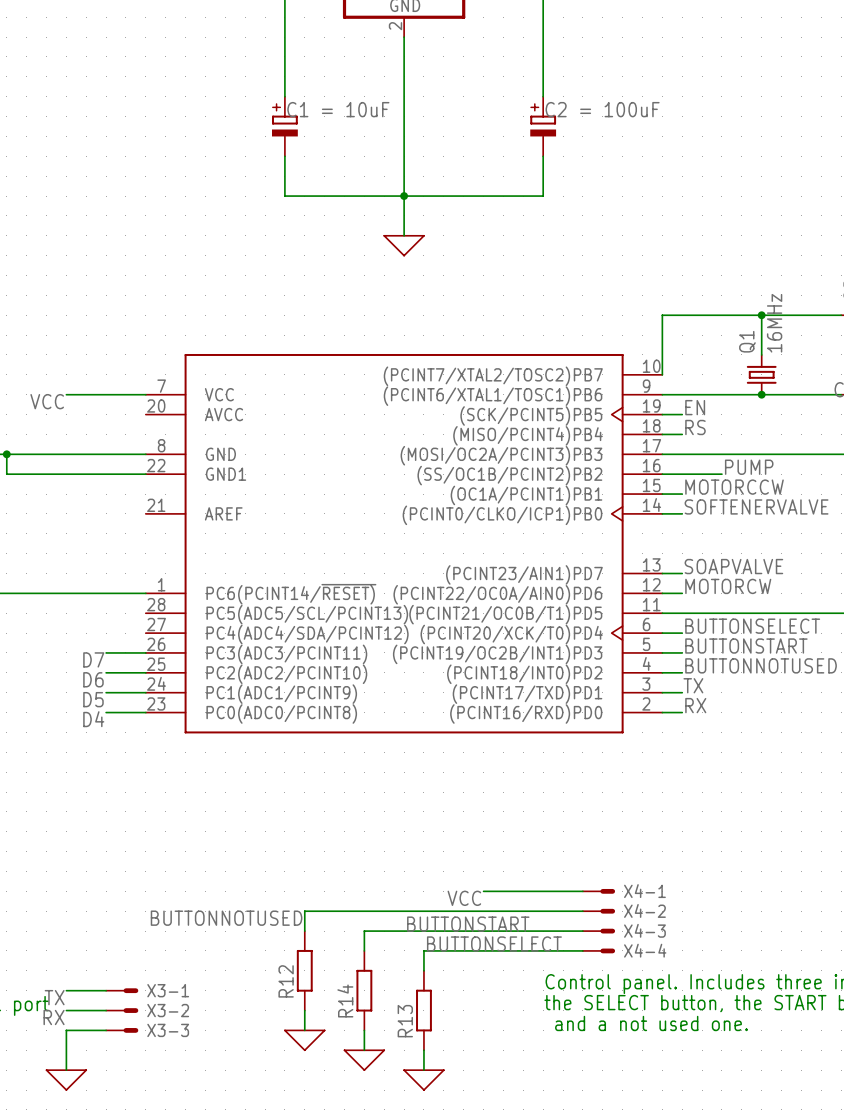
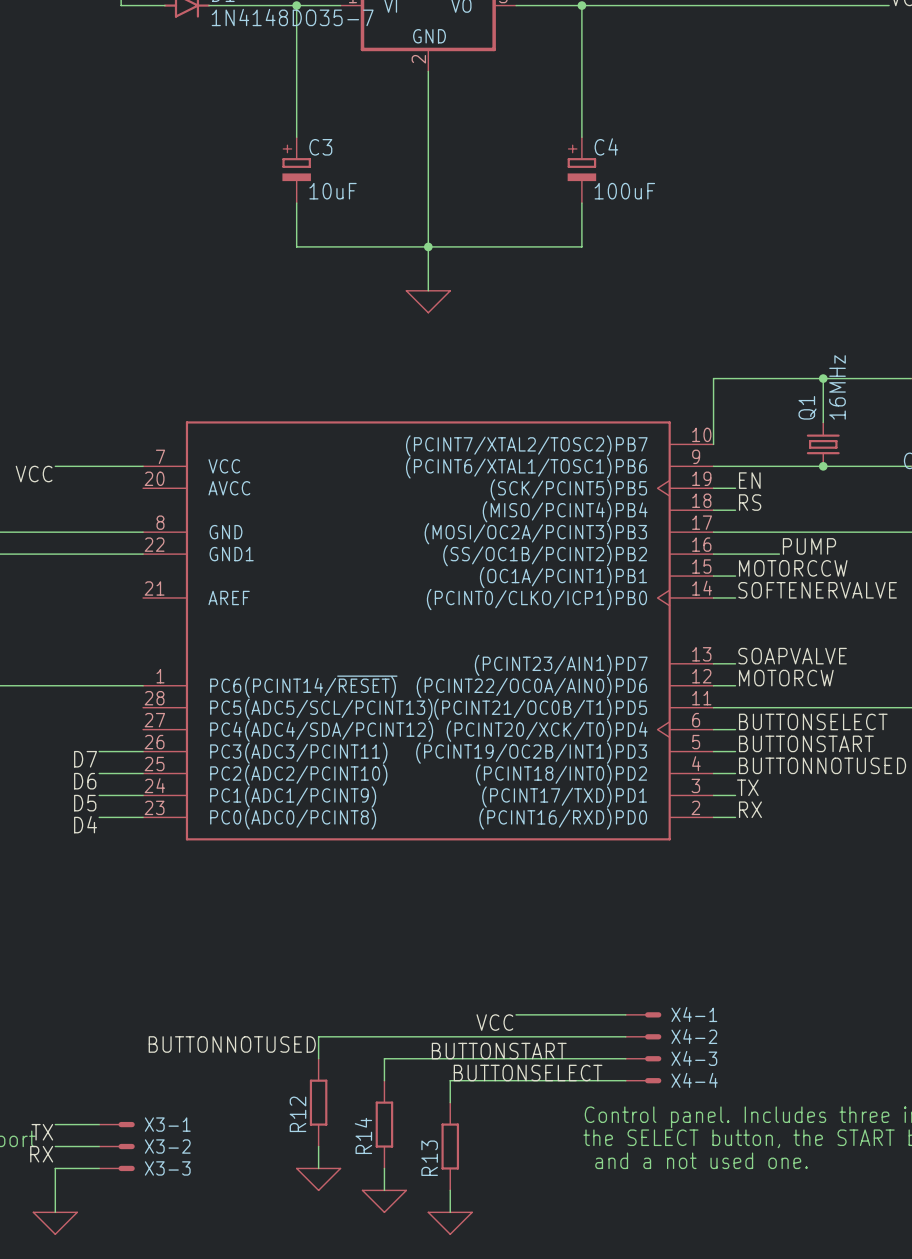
part: (284, 126) -> none
C3: none -> 10uF (296, 170)
part: (543, 126) -> none
C4: none -> 100uF (581, 170)

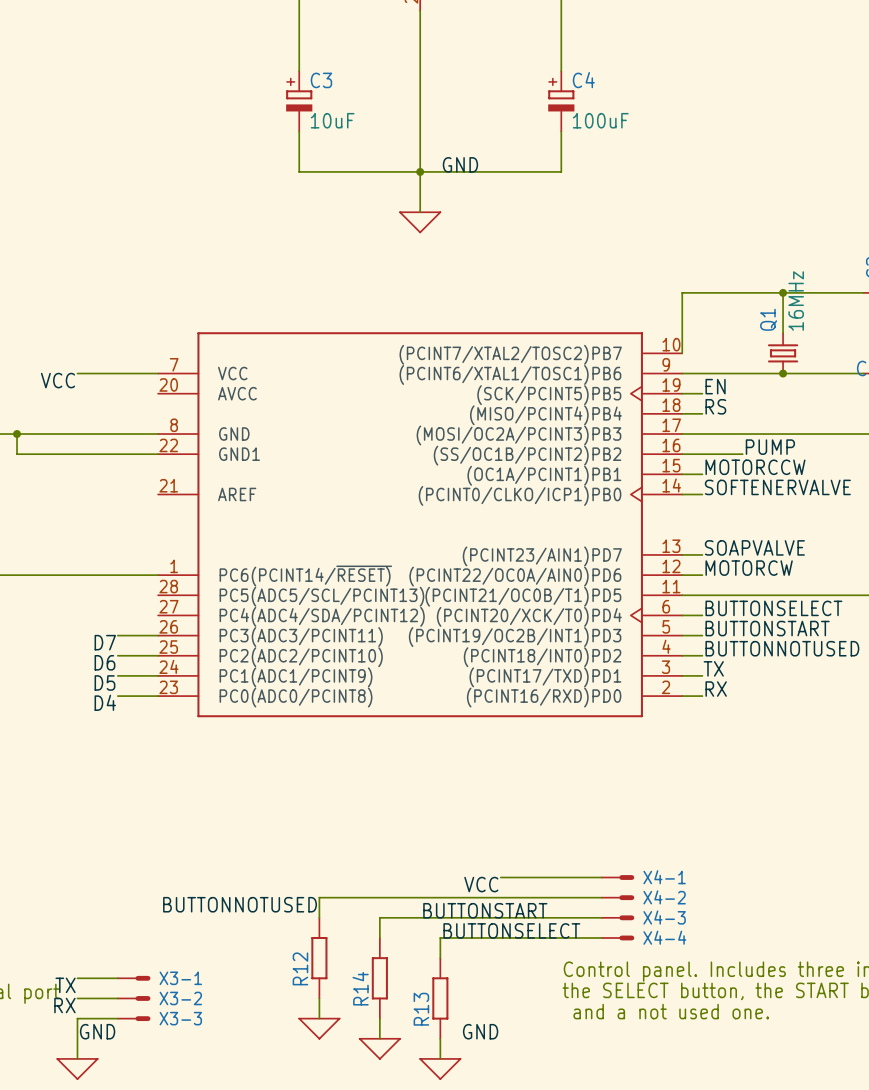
label: none -> GND (460, 164)
label: none -> GND (97, 1031)
label: none -> GND (480, 1031)

